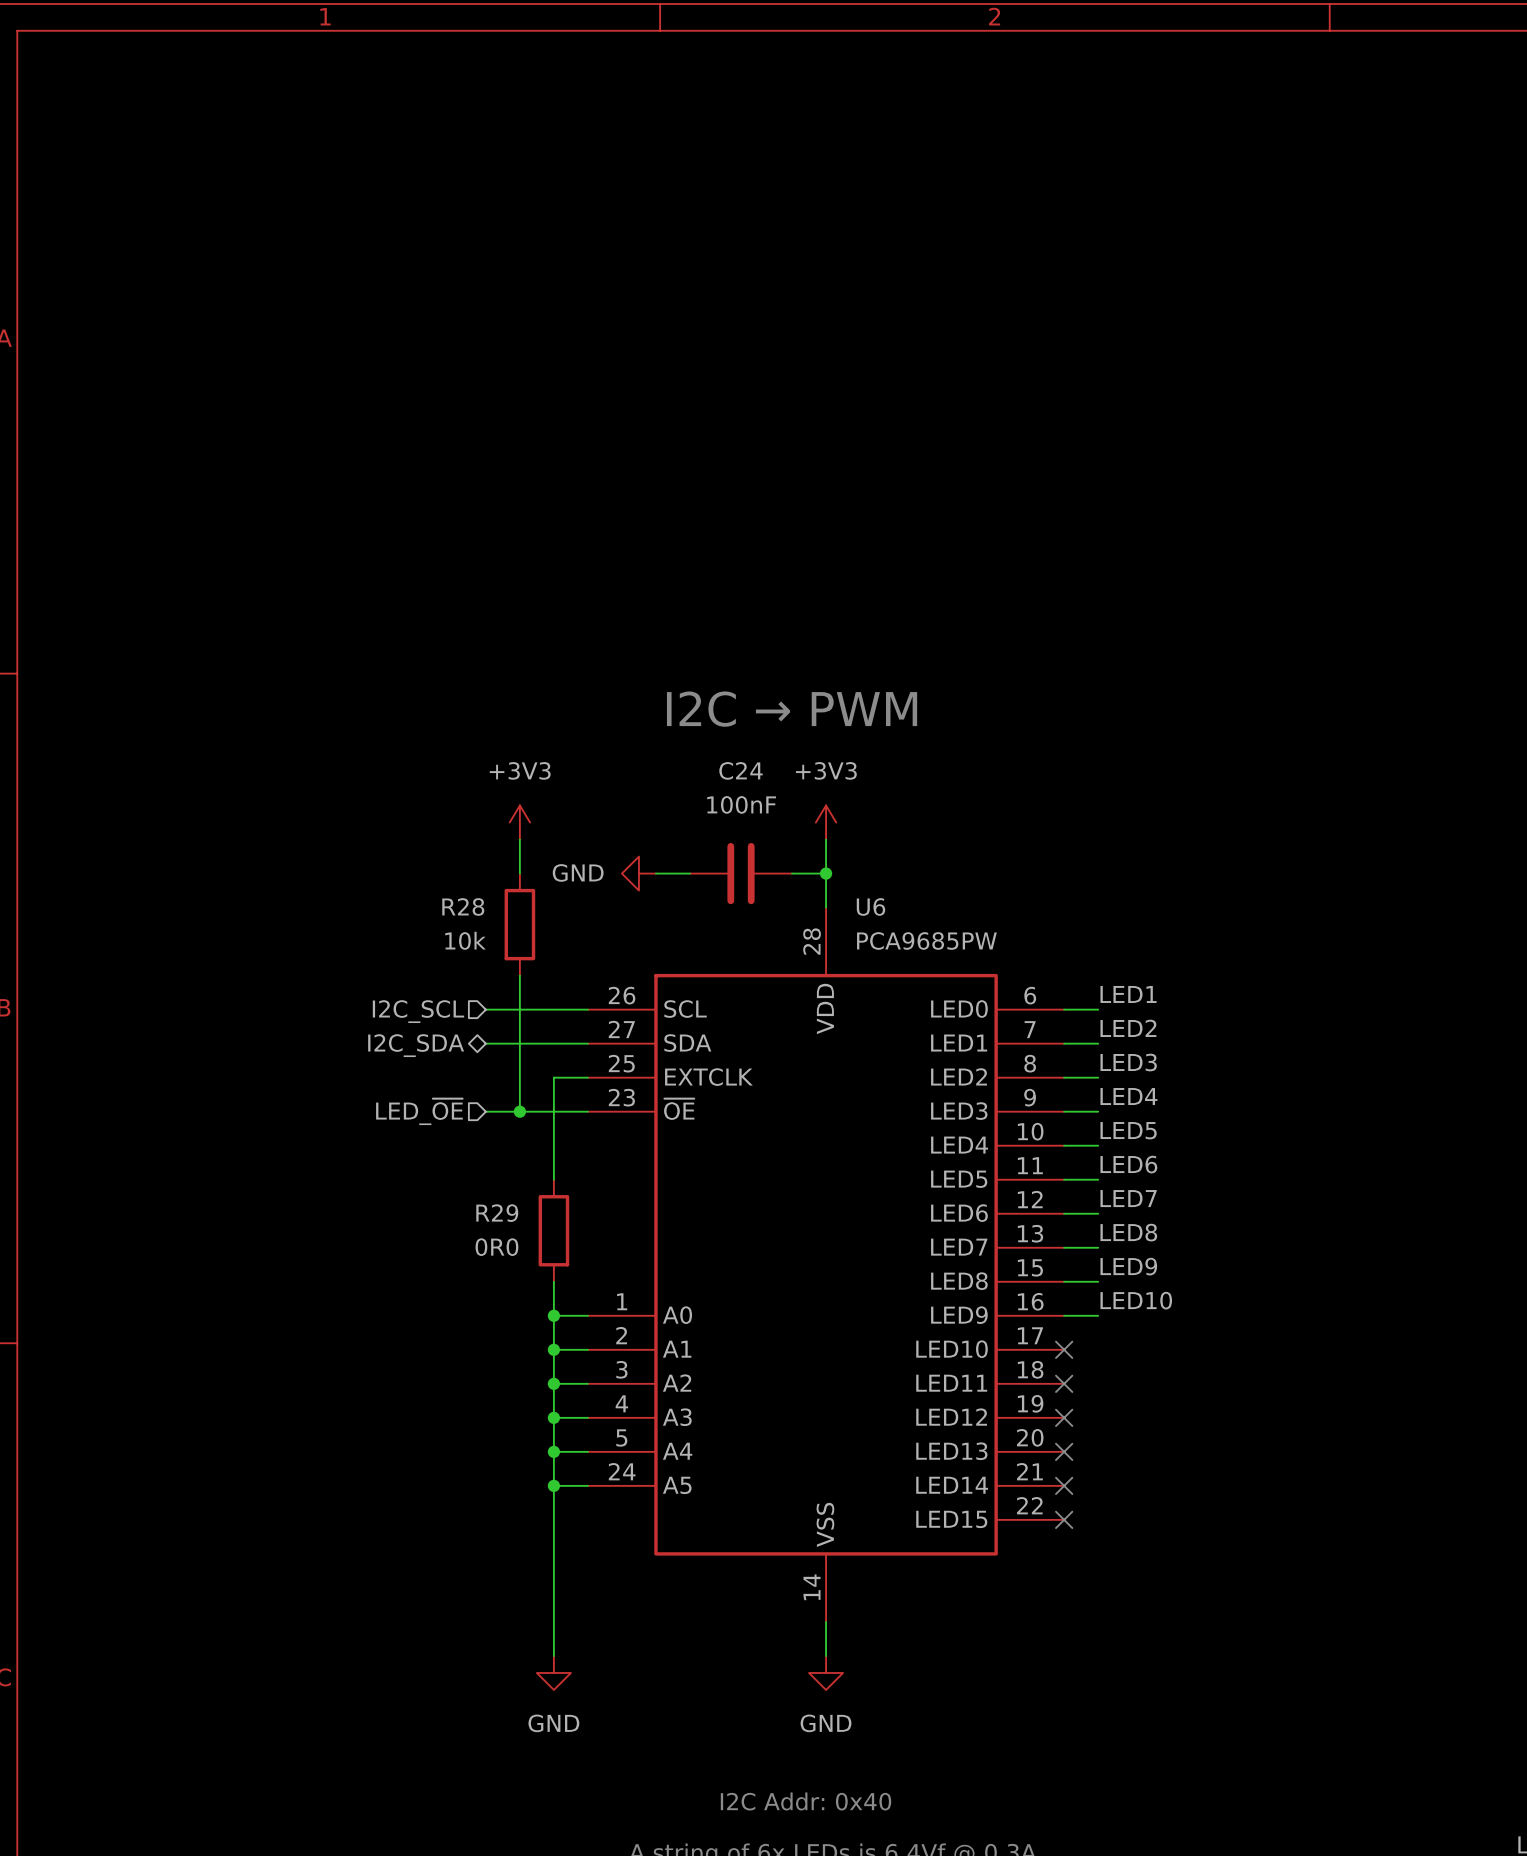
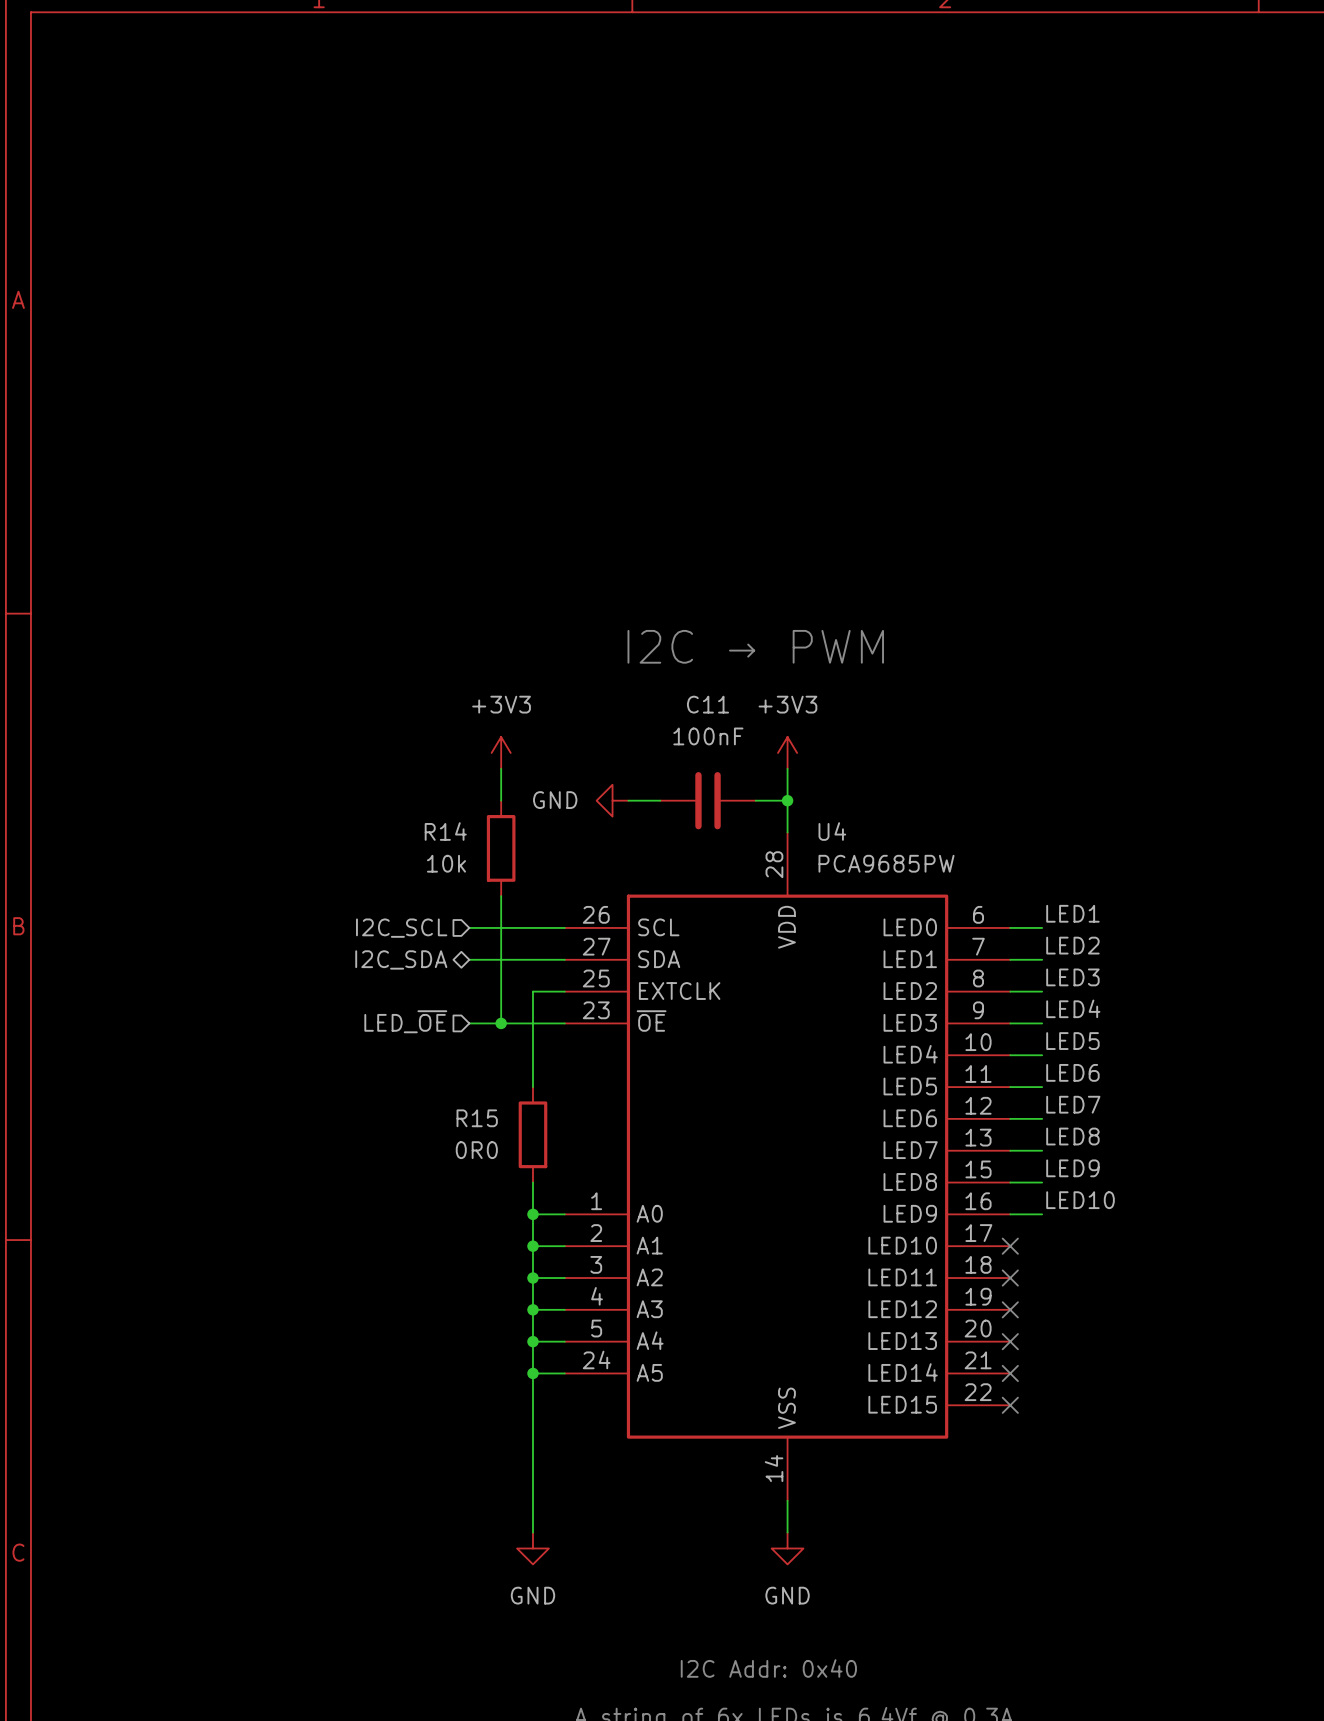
C24 name: C24 (741, 770) -> C11 (708, 704)
R28 name: R28 (463, 906) -> R14 (445, 831)
U6 name: U6 (870, 906) -> U4 (832, 831)
R29 name: R29 (497, 1213) -> R15 (477, 1118)

